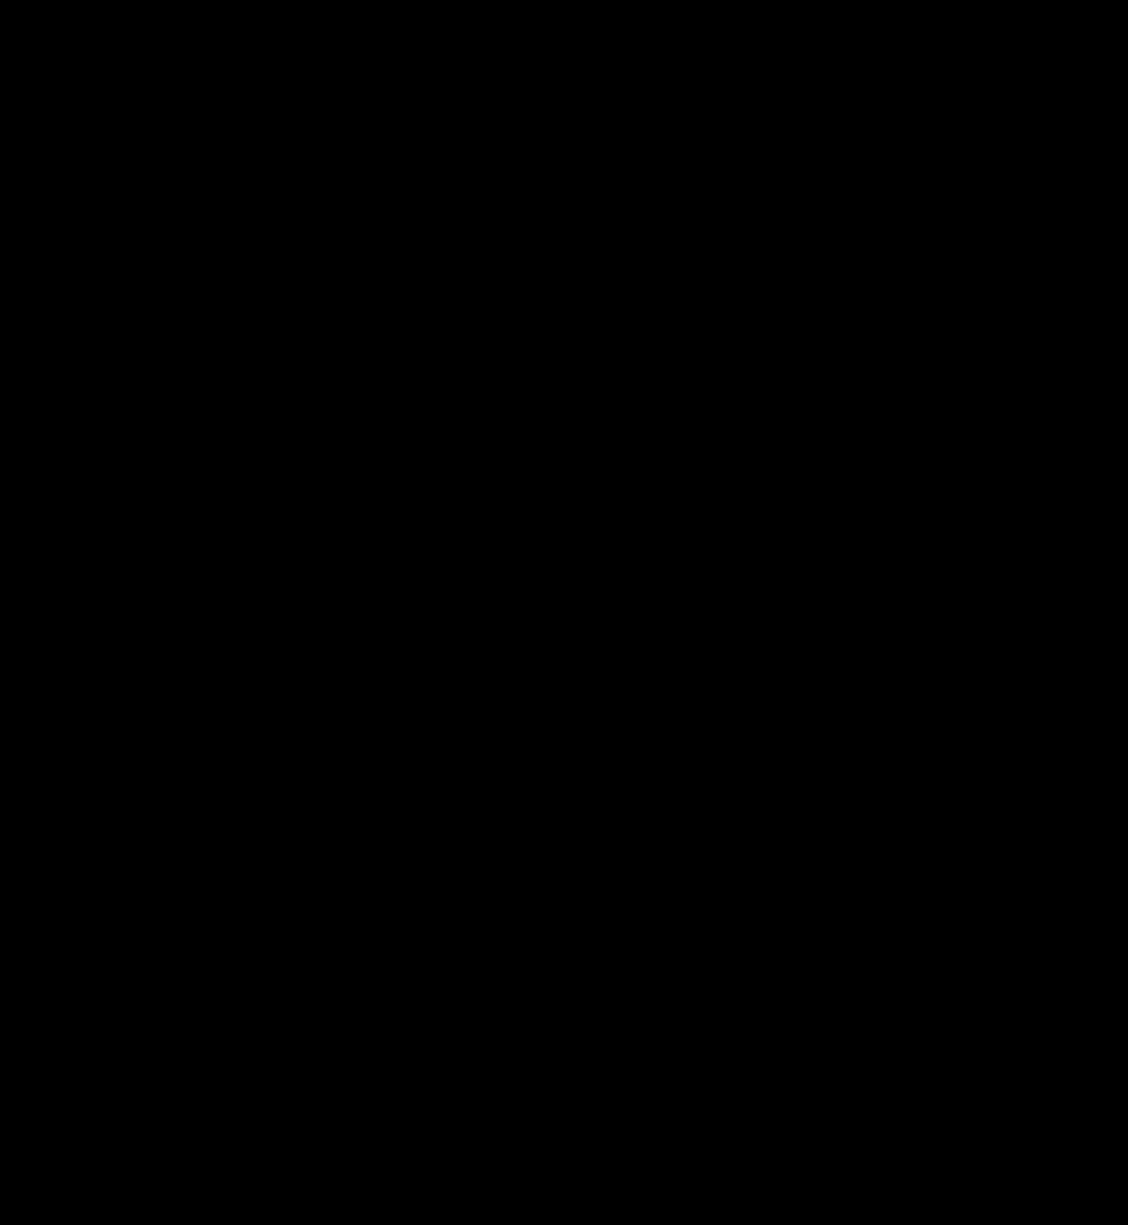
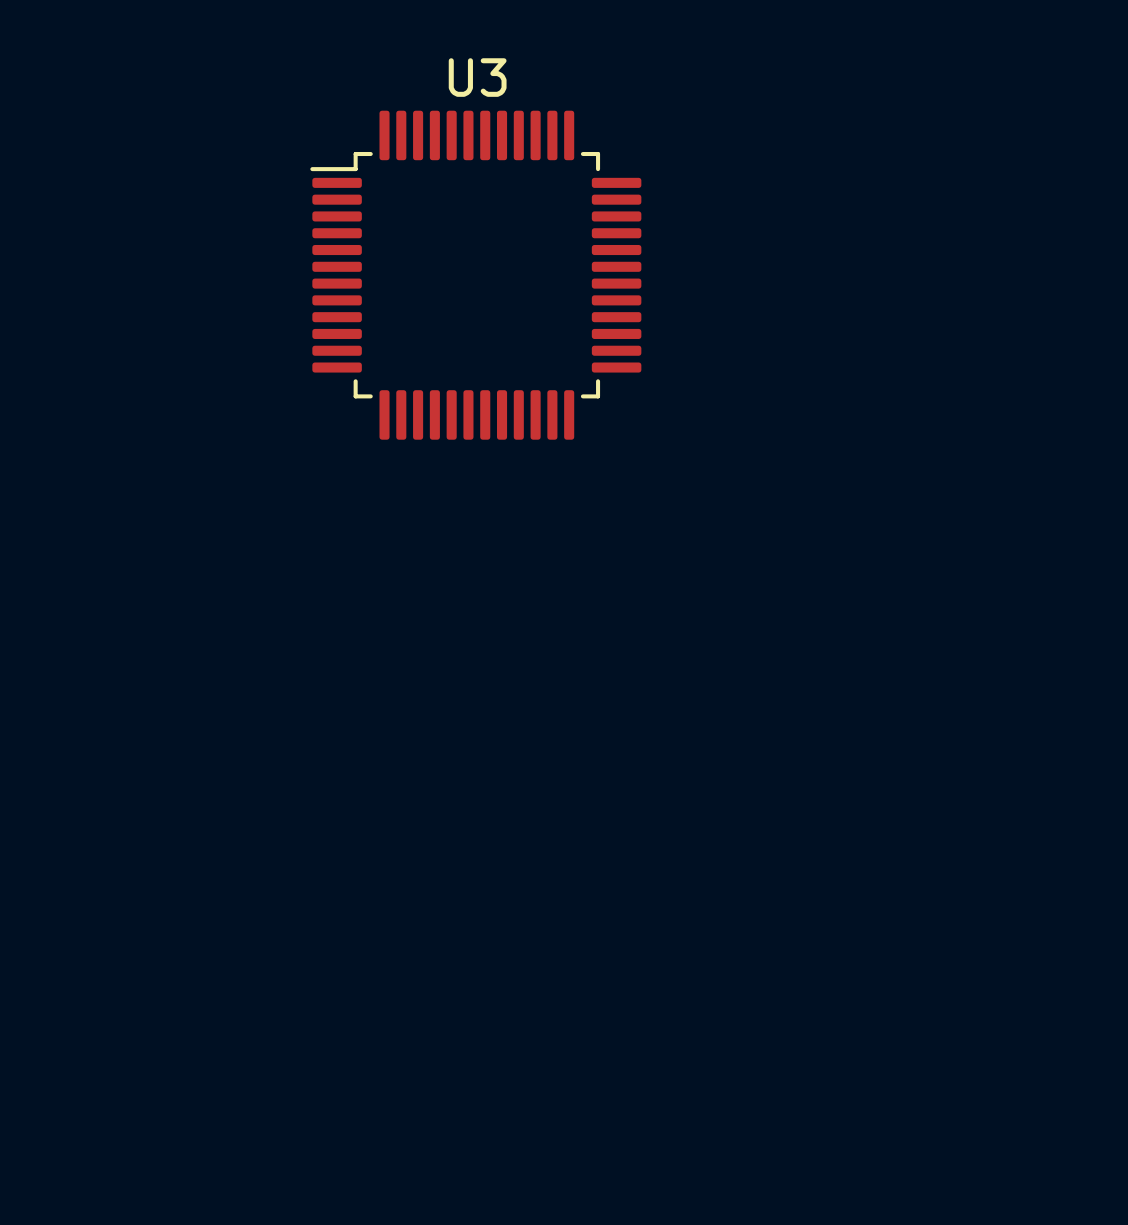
U3: none -> (475, 275)

